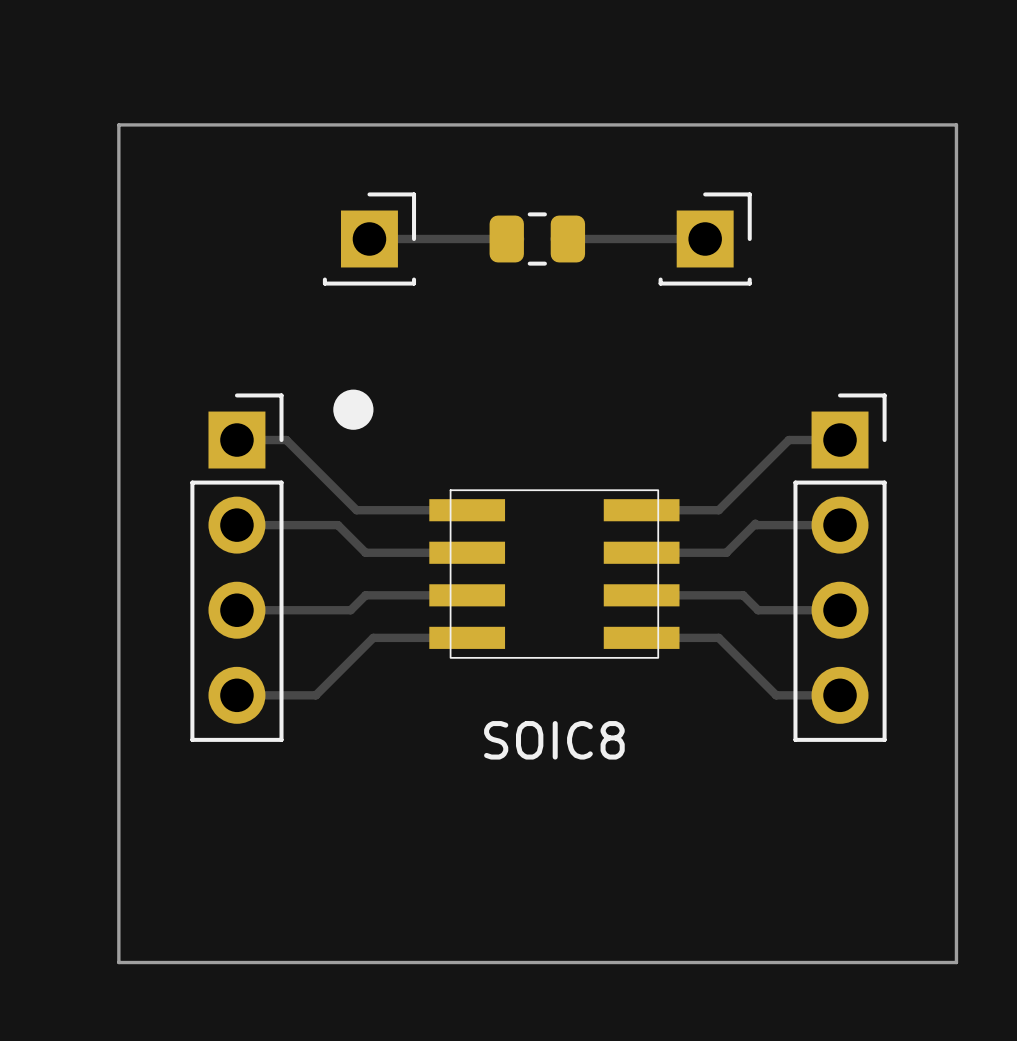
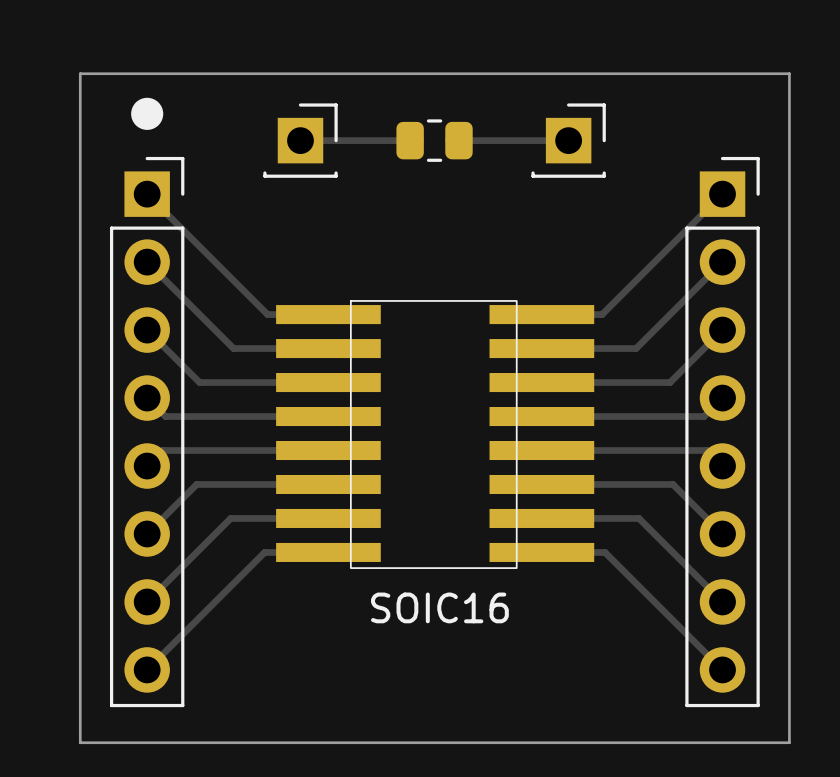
board edge: (118, 124) (956, 124) (956, 962) (118, 962) (118, 124) -> (80, 73) (80, 742) (789, 742) (789, 73) (80, 73)
track: none -> (147, 194) (267, 314) (328, 314)
track: none -> (722, 194) (602, 314) (541, 314)
track: none -> (147, 262) (233, 348) (328, 348)
track: none -> (722, 262) (636, 348) (541, 348)
drawing position: (353, 409) -> (147, 113)
track: (236, 440) (286, 440) (356, 510) (450, 510) -> none
track: (840, 440) (788, 440) (718, 510) (624, 510) -> none
track: none -> (147, 330) (199, 382) (328, 382)
track: none -> (722, 330) (670, 382) (541, 382)
track: (236, 525) (337, 525) (365, 552) (450, 552) -> none
track: (840, 525) (755, 523) (726, 552) (624, 552) -> none
track: none -> (147, 398) (165, 416) (328, 416)
track: none -> (722, 398) (704, 416) (541, 416)
part: (236, 567) -> none
part: (840, 567) -> none
SOIC8: (554, 574) -> none
track: (450, 595) (365, 595) (350, 610) (236, 610) -> none
track: (624, 595) (743, 595) (758, 610) (840, 610) -> none
part: none -> (147, 432)
part: none -> (722, 432)
SOIC16: none -> (435, 434)
track: none -> (328, 450) (162, 450) (147, 466)
track: none -> (541, 450) (707, 450) (722, 466)
track: (450, 637) (373, 637) (315, 695) (236, 695) -> none
track: (624, 637) (718, 637) (776, 695) (840, 695) -> none
track: none -> (328, 484) (196, 484) (147, 533)
track: none -> (541, 484) (673, 484) (722, 533)
track: none -> (328, 518) (230, 518) (147, 601)
track: none -> (541, 518) (639, 518) (722, 601)
track: none -> (328, 552) (264, 552) (147, 669)
track: none -> (541, 552) (605, 552) (722, 669)

